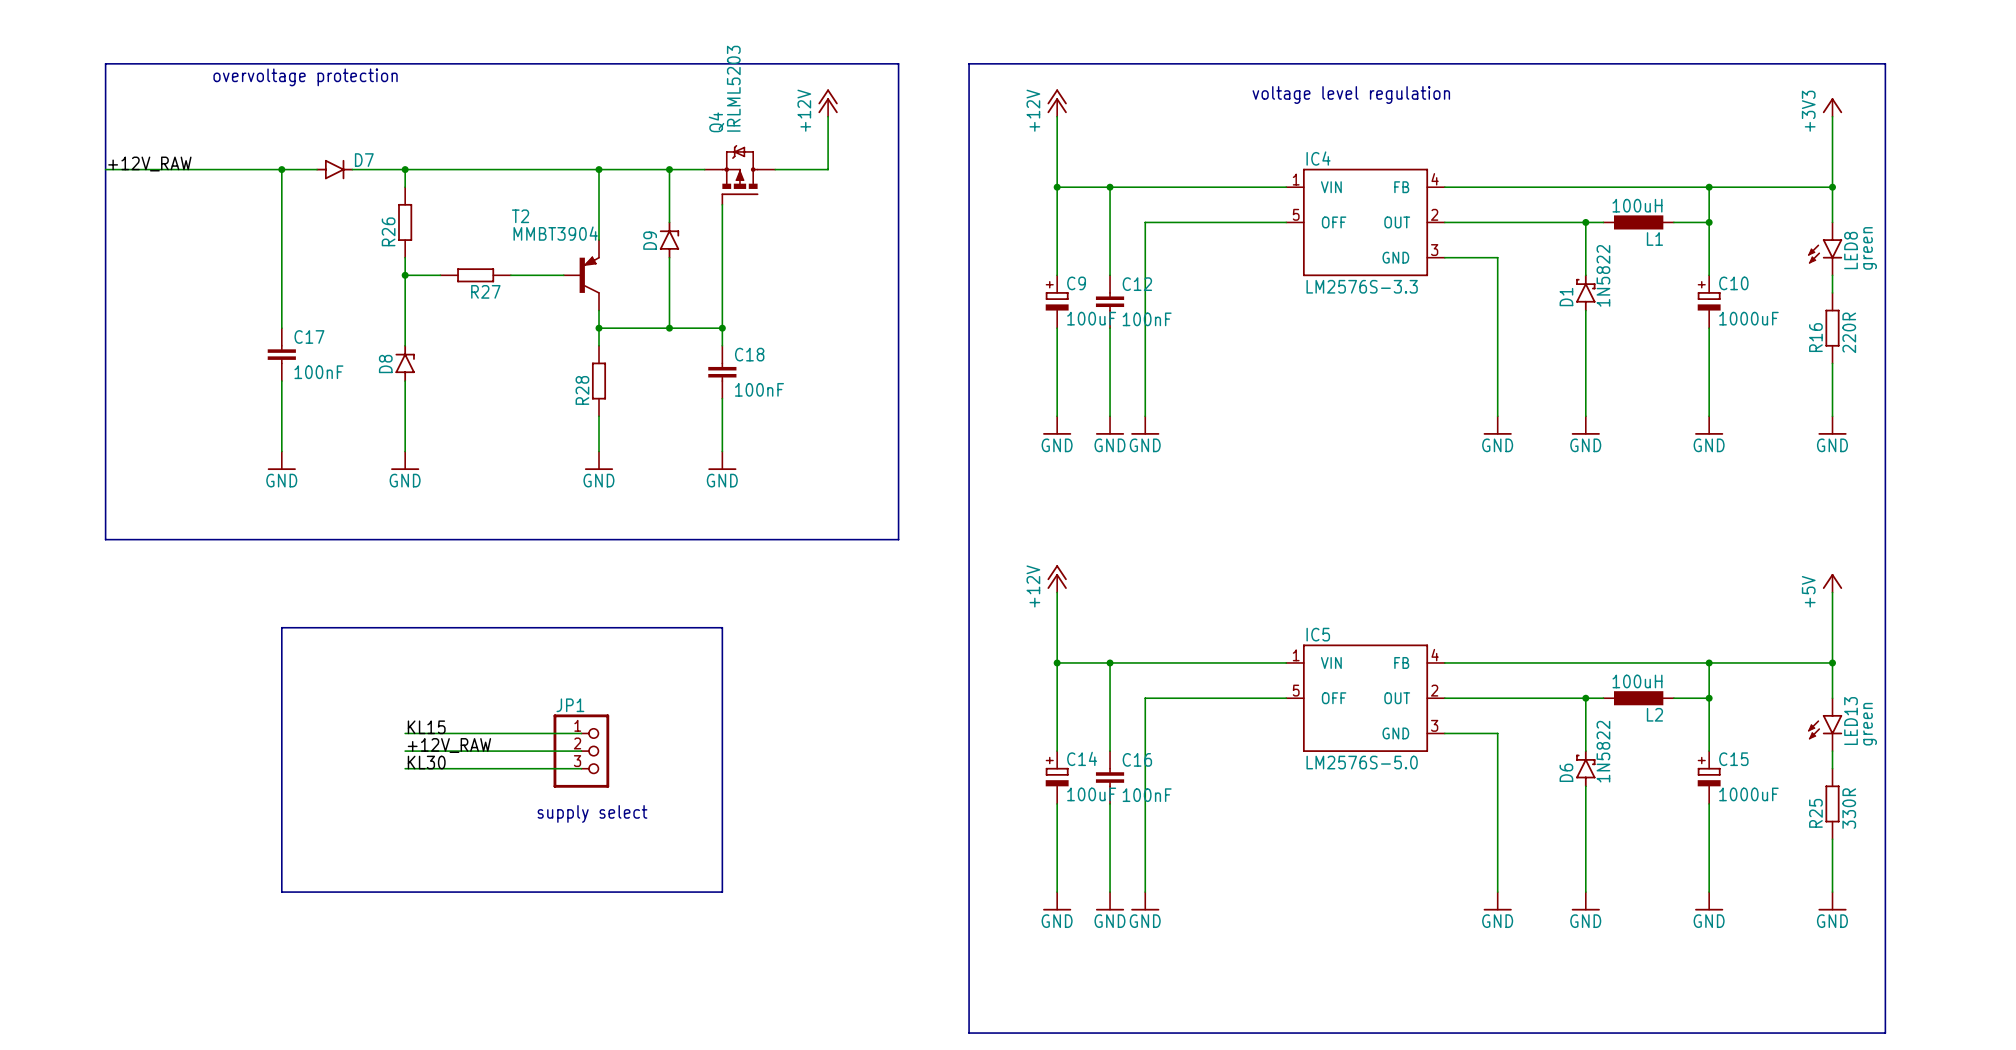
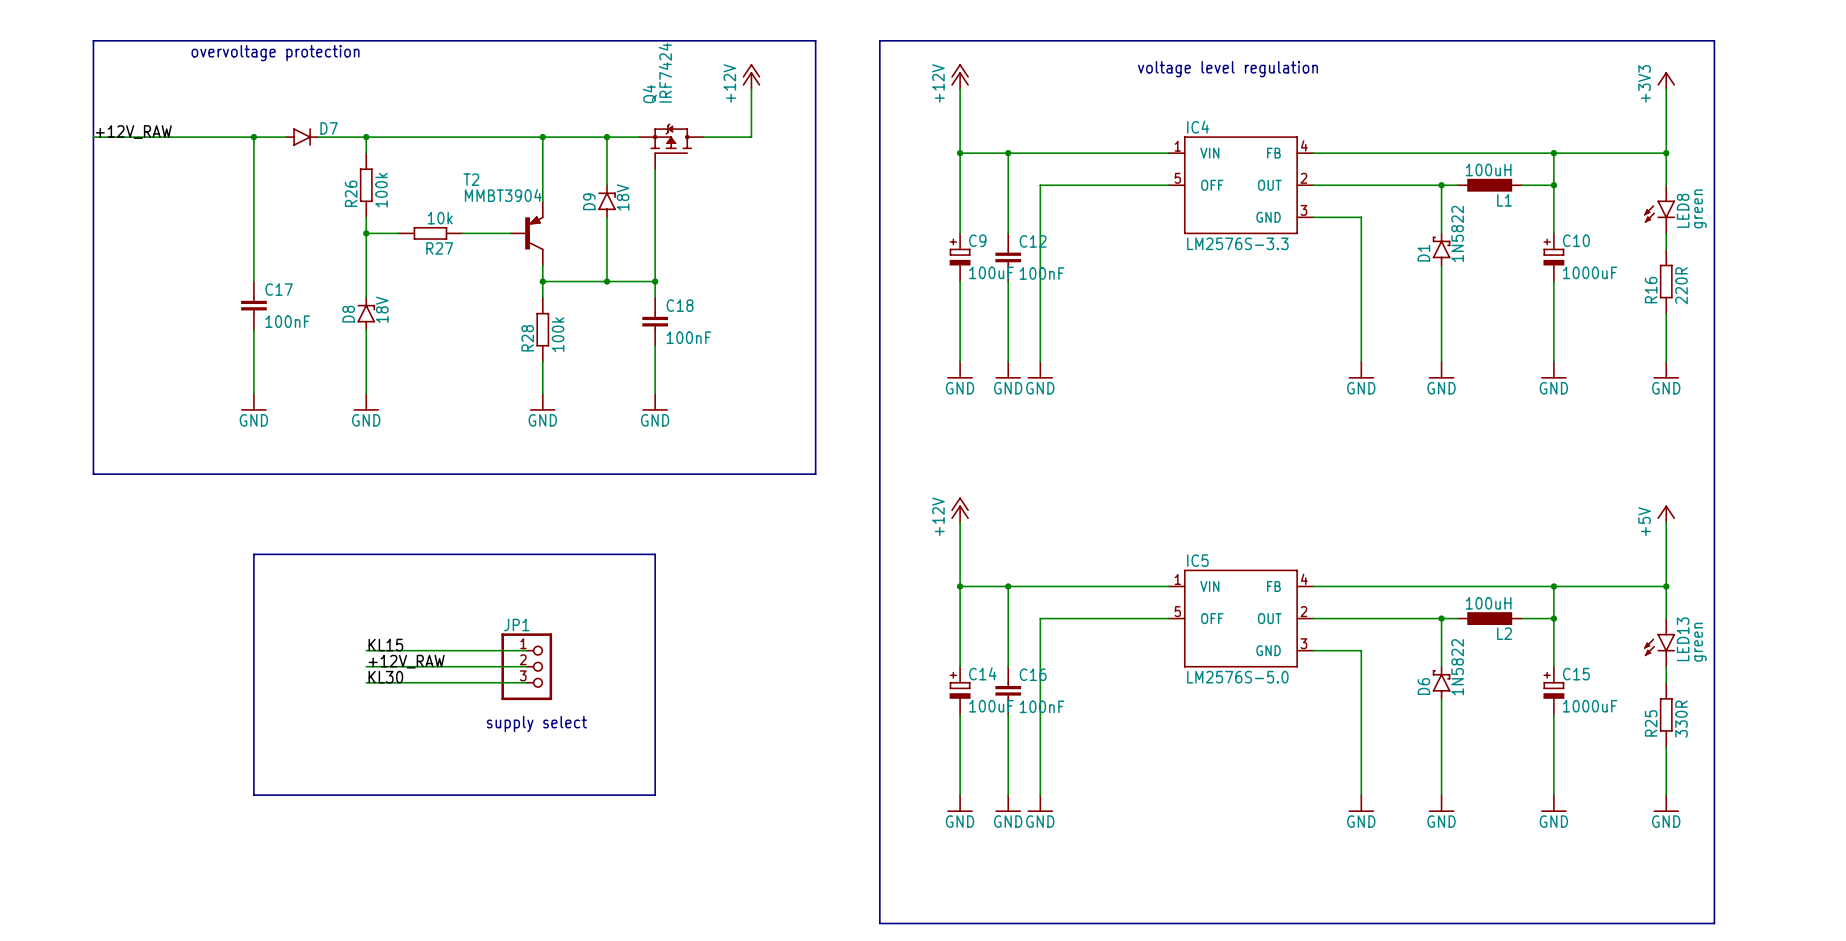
Q4 value: IRLML5203 (733, 88) -> IRF7424 (665, 72)
Q4 symbol: [704, 145, 776, 206] -> [639, 123, 704, 170]
R26 value: none -> 100k (381, 190)
D9 value: none -> 18V (623, 197)
R27 value: none -> 10k (440, 218)
D8 value: none -> 18V (382, 309)
R28 value: none -> 100k (558, 334)

